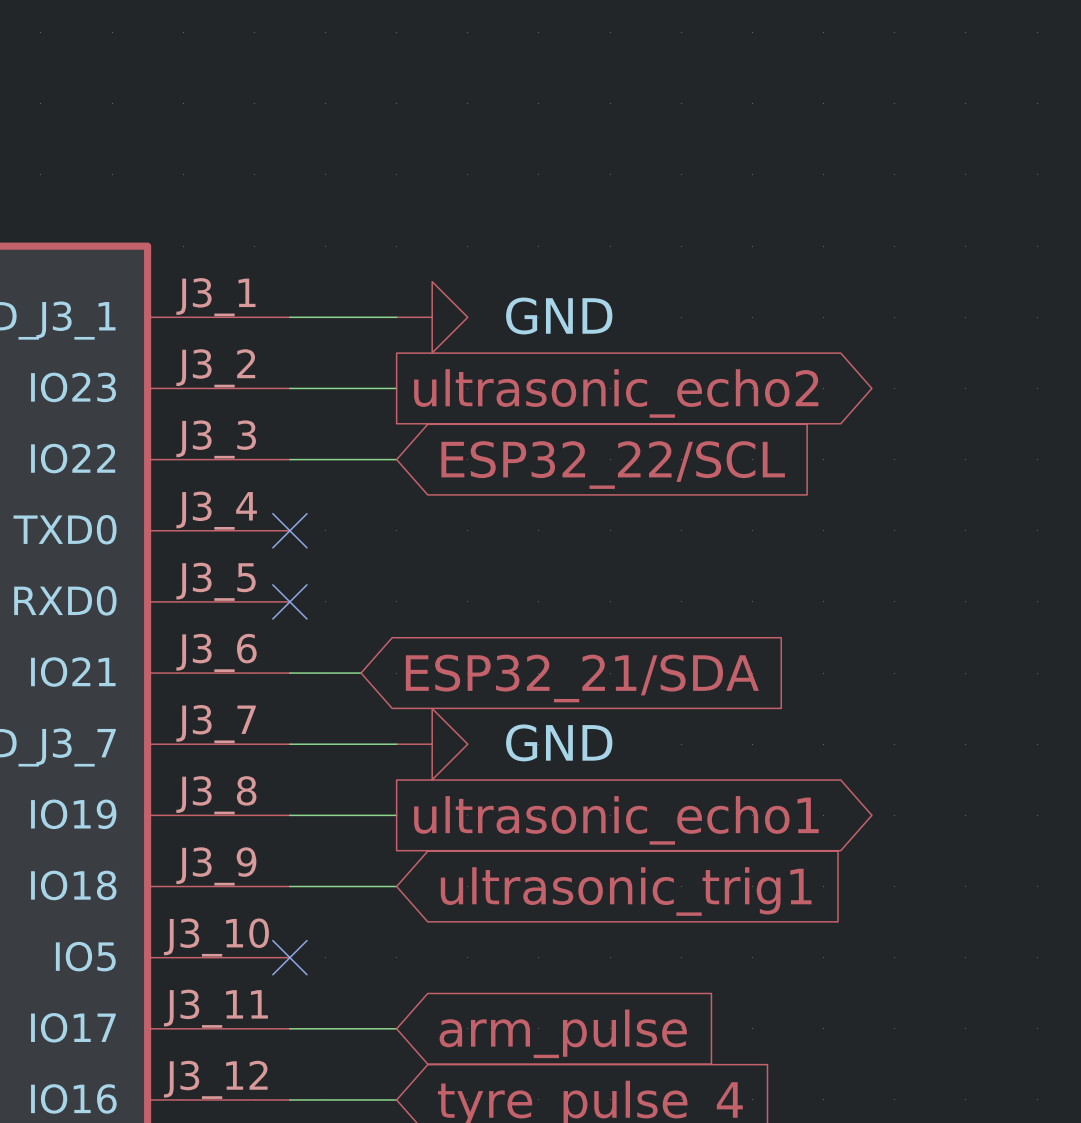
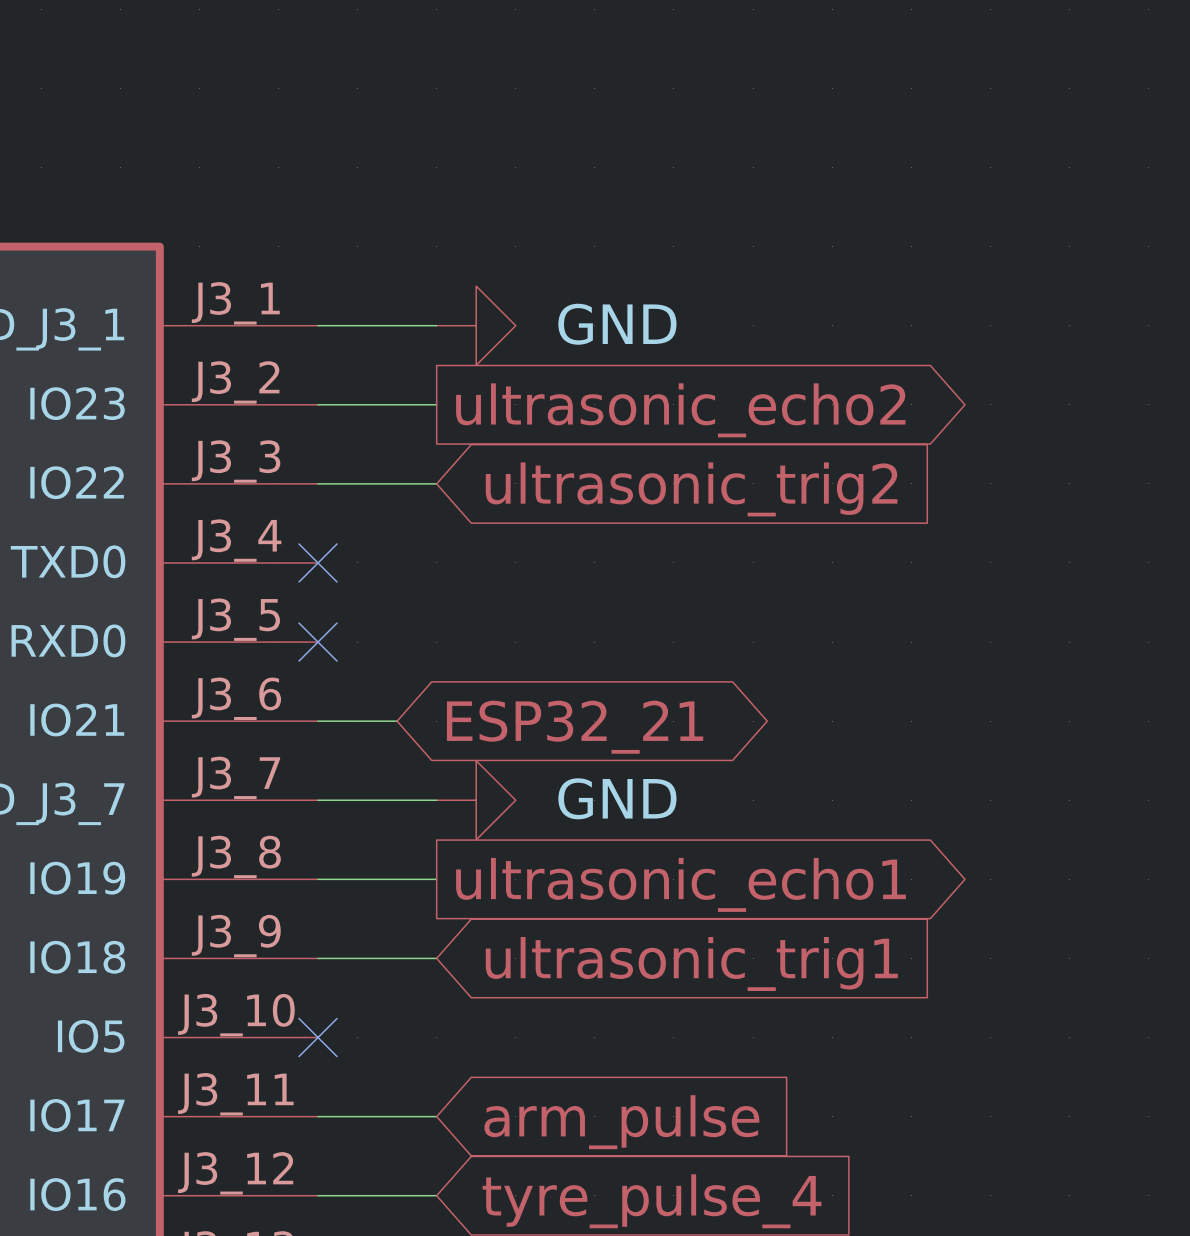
global label: ESP32_22/SCL (613, 465) -> ultrasonic_trig2 (691, 489)
global label shape: input (582, 678) -> bidirectional (575, 727)
global label: ESP32_21/SDA (582, 678) -> ESP32_21 (575, 727)

